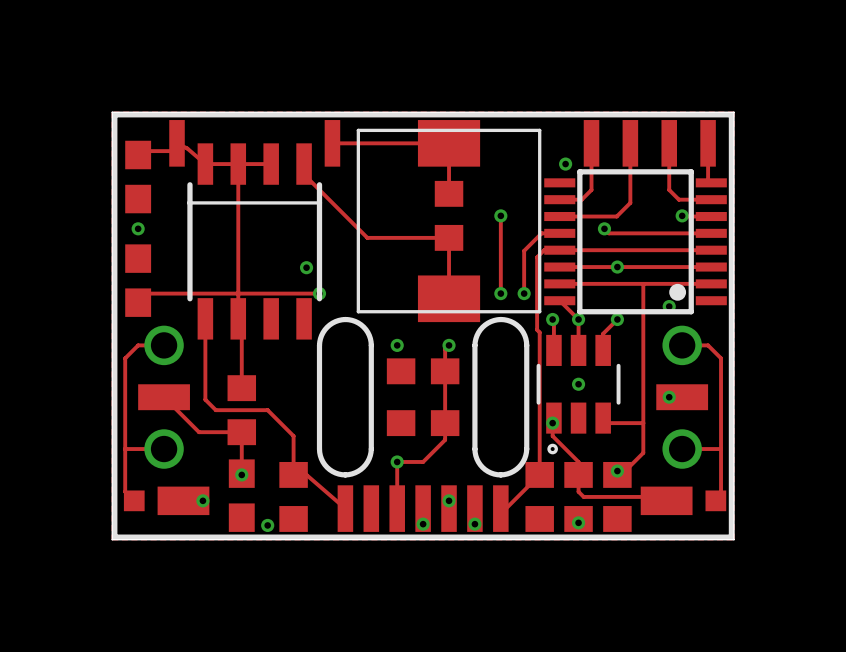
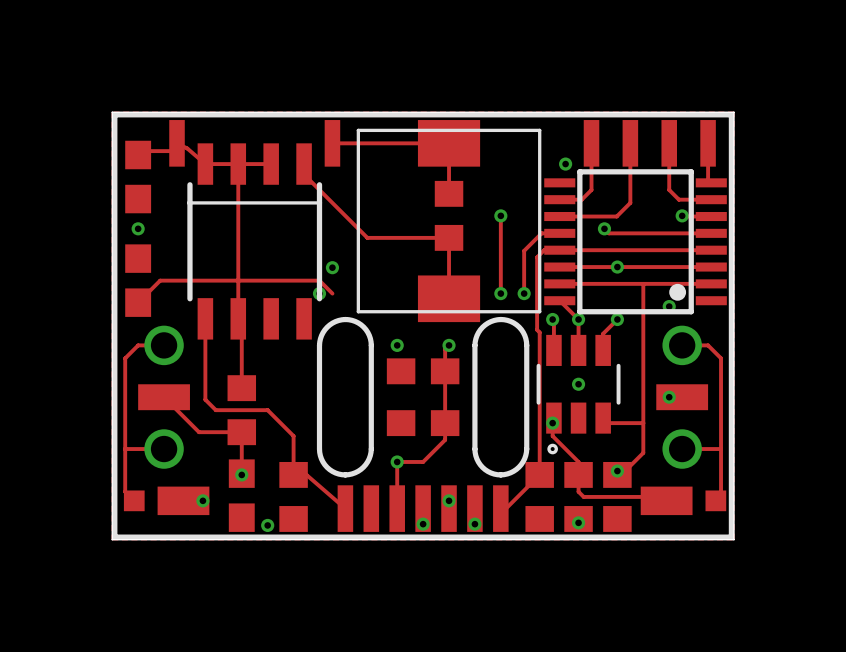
via position: (306, 267) -> (332, 267)
track: (147, 293) (319, 293) -> (147, 293) (160, 280) (319, 280) (332, 293)

